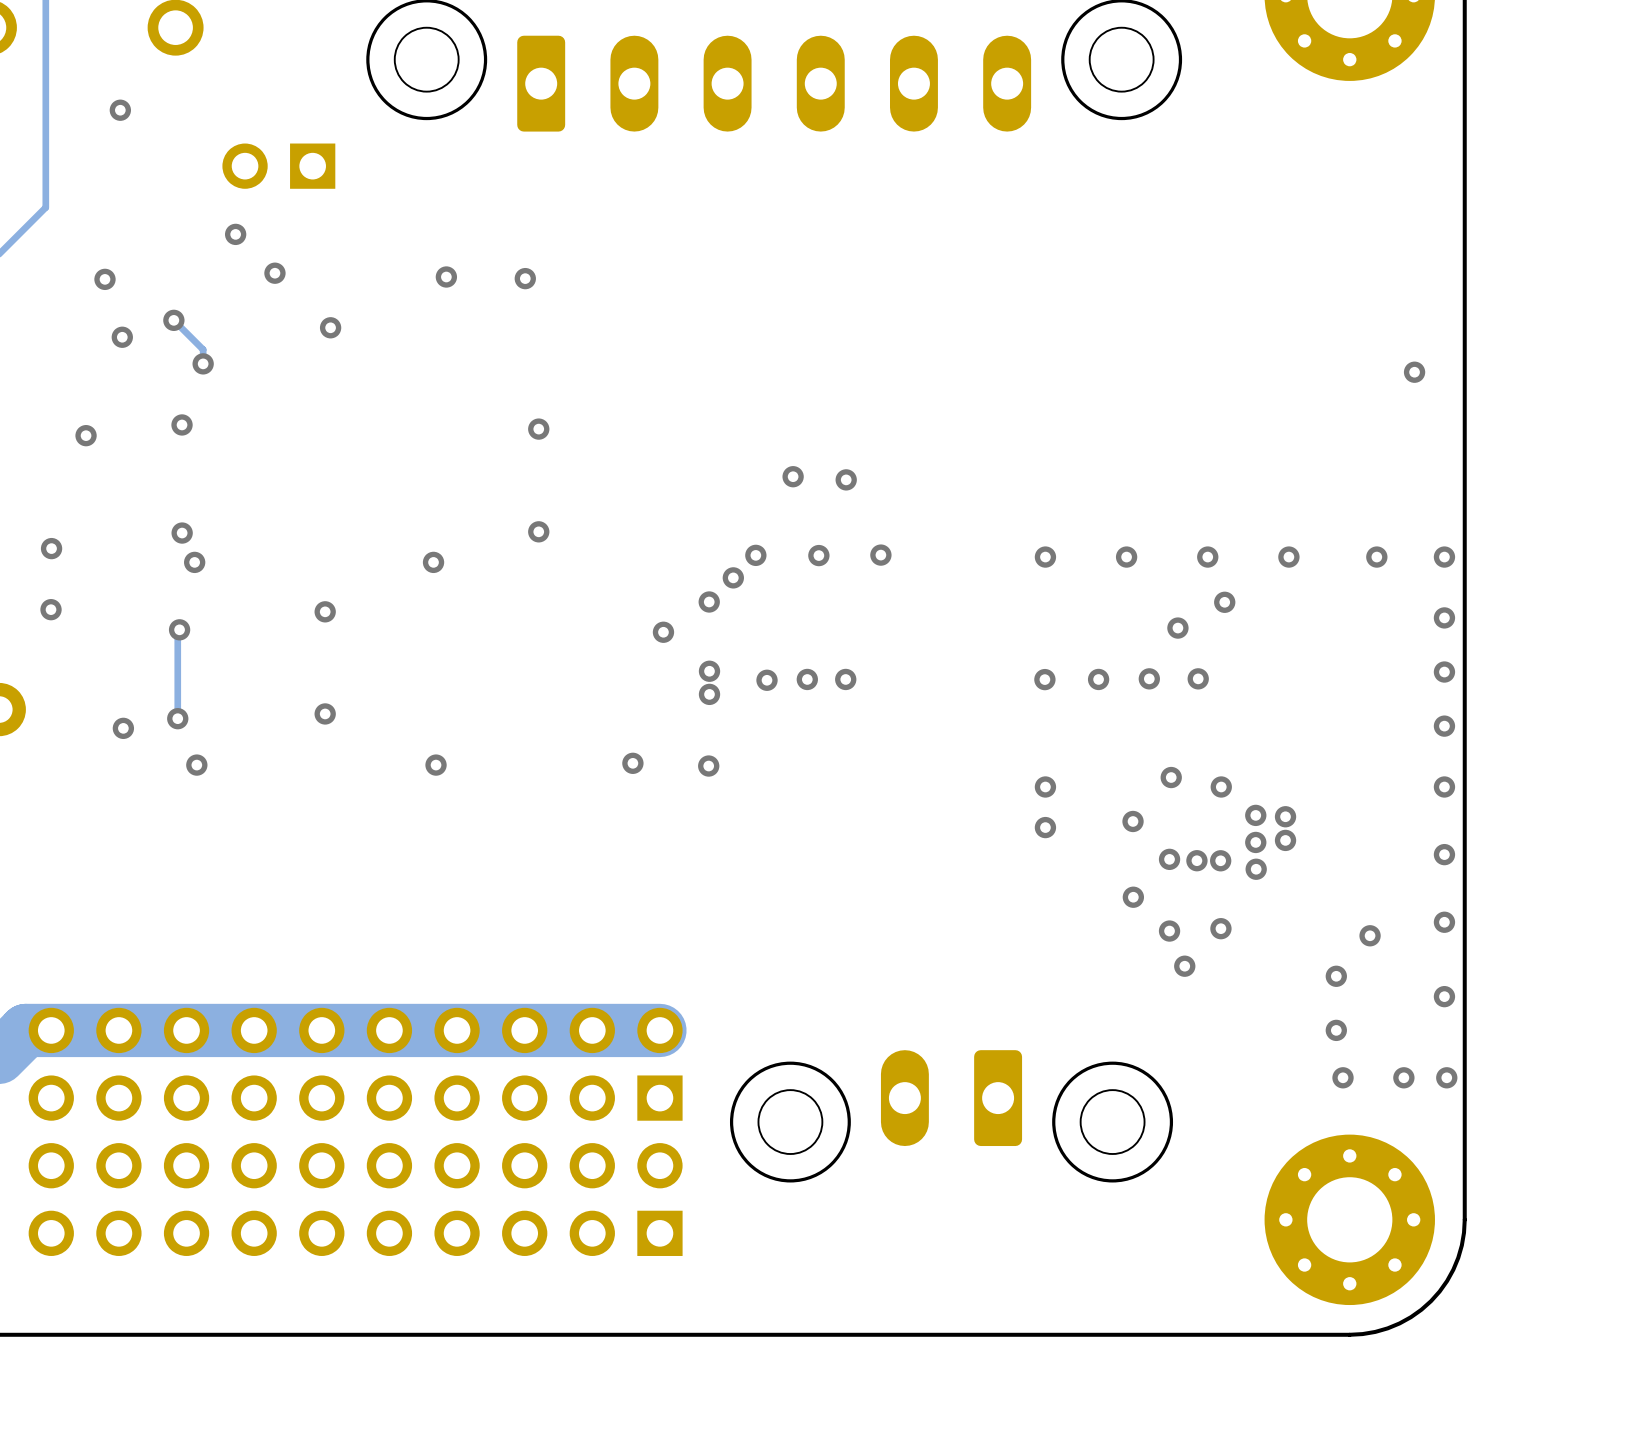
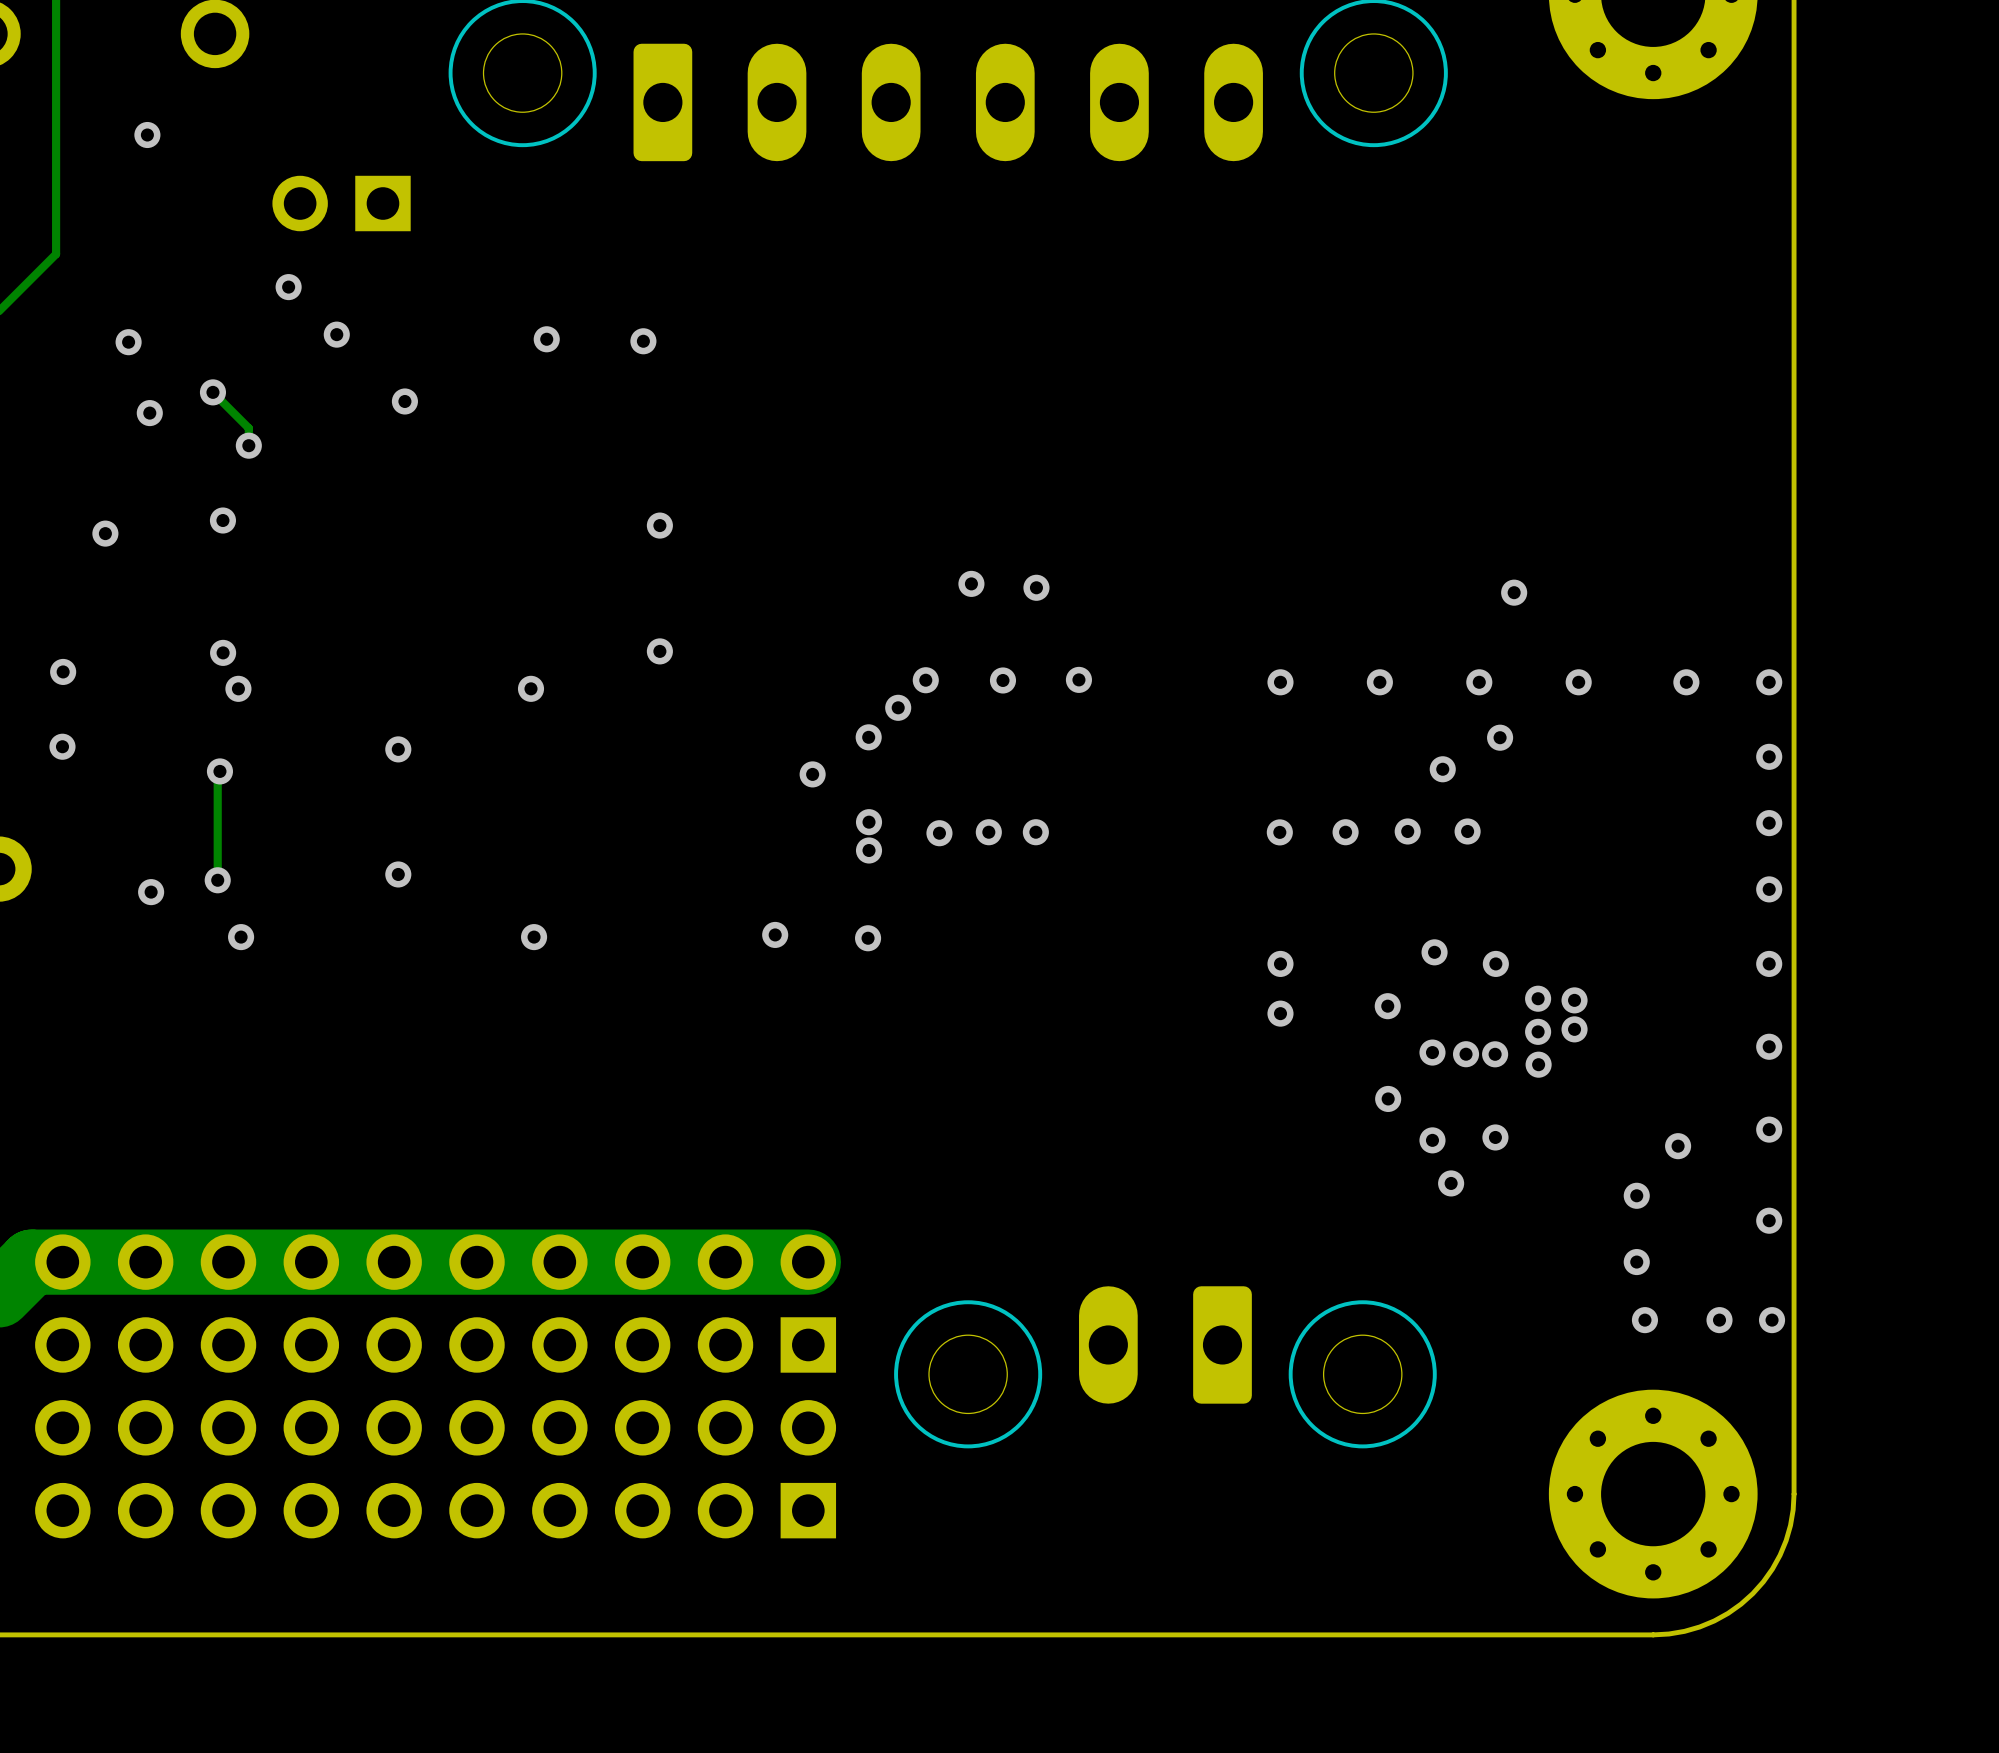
via: (1414, 372) -> none
via: none -> (1514, 592)

